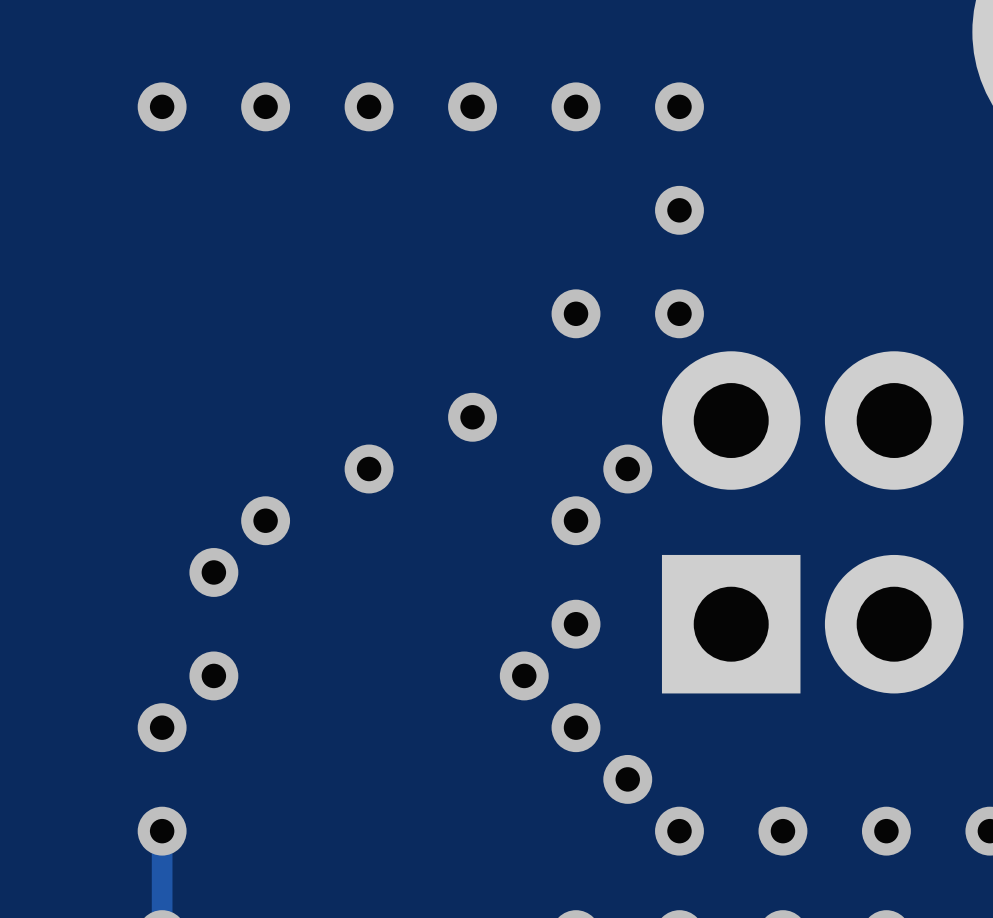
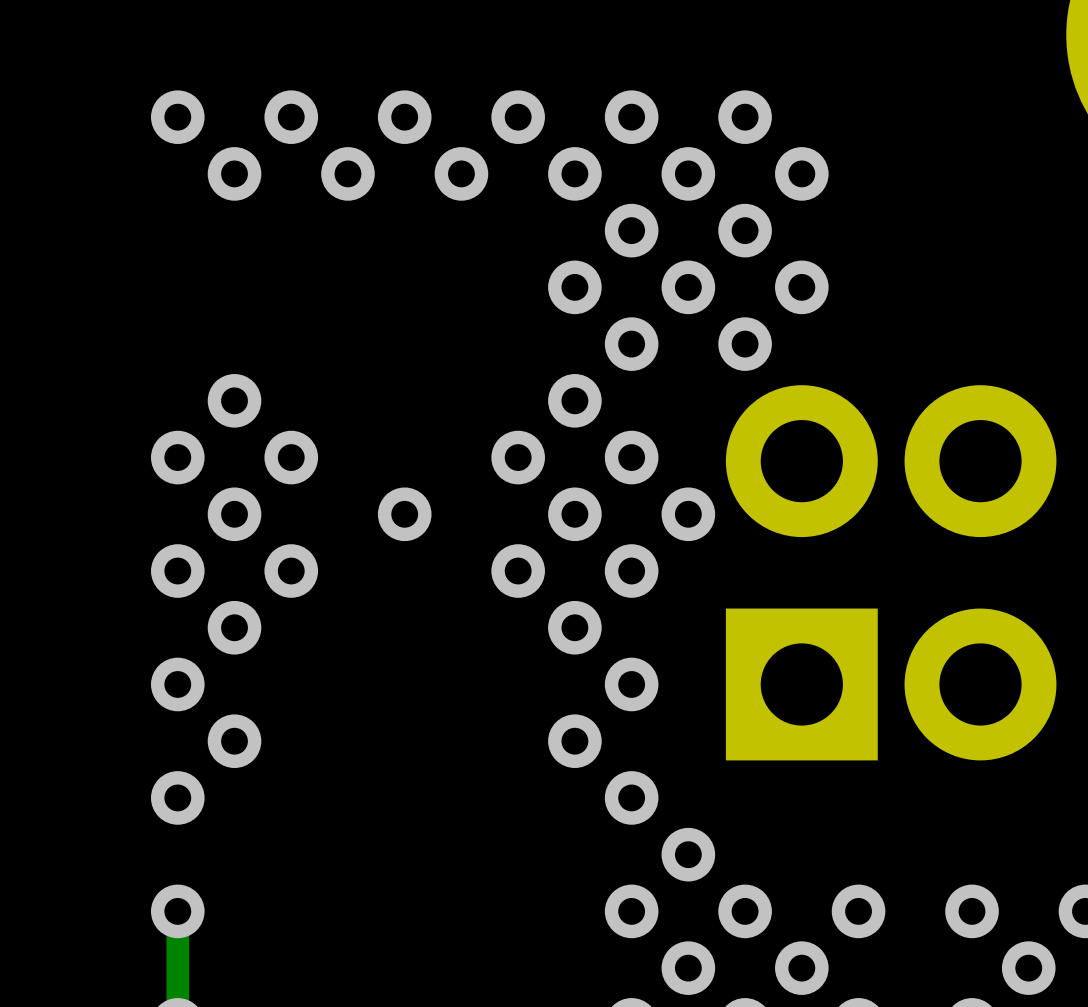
via: none -> (234, 173)
via: none -> (347, 173)
via: none -> (461, 173)
via: none -> (574, 173)
via: none -> (688, 173)
via: none -> (801, 173)
via: none -> (631, 230)
via: none -> (574, 287)
via: none -> (688, 287)
via: none -> (801, 287)
via: none -> (234, 400)
via: none -> (574, 400)
via: none -> (177, 457)
via: none -> (291, 457)
via: none -> (631, 457)
via: none -> (234, 514)
via: none -> (574, 514)
via: none -> (177, 571)
via: none -> (518, 571)
via: none -> (574, 627)
via: none -> (177, 684)
via: none -> (631, 911)
via: none -> (688, 968)
via: none -> (801, 968)
via: none -> (1028, 968)

